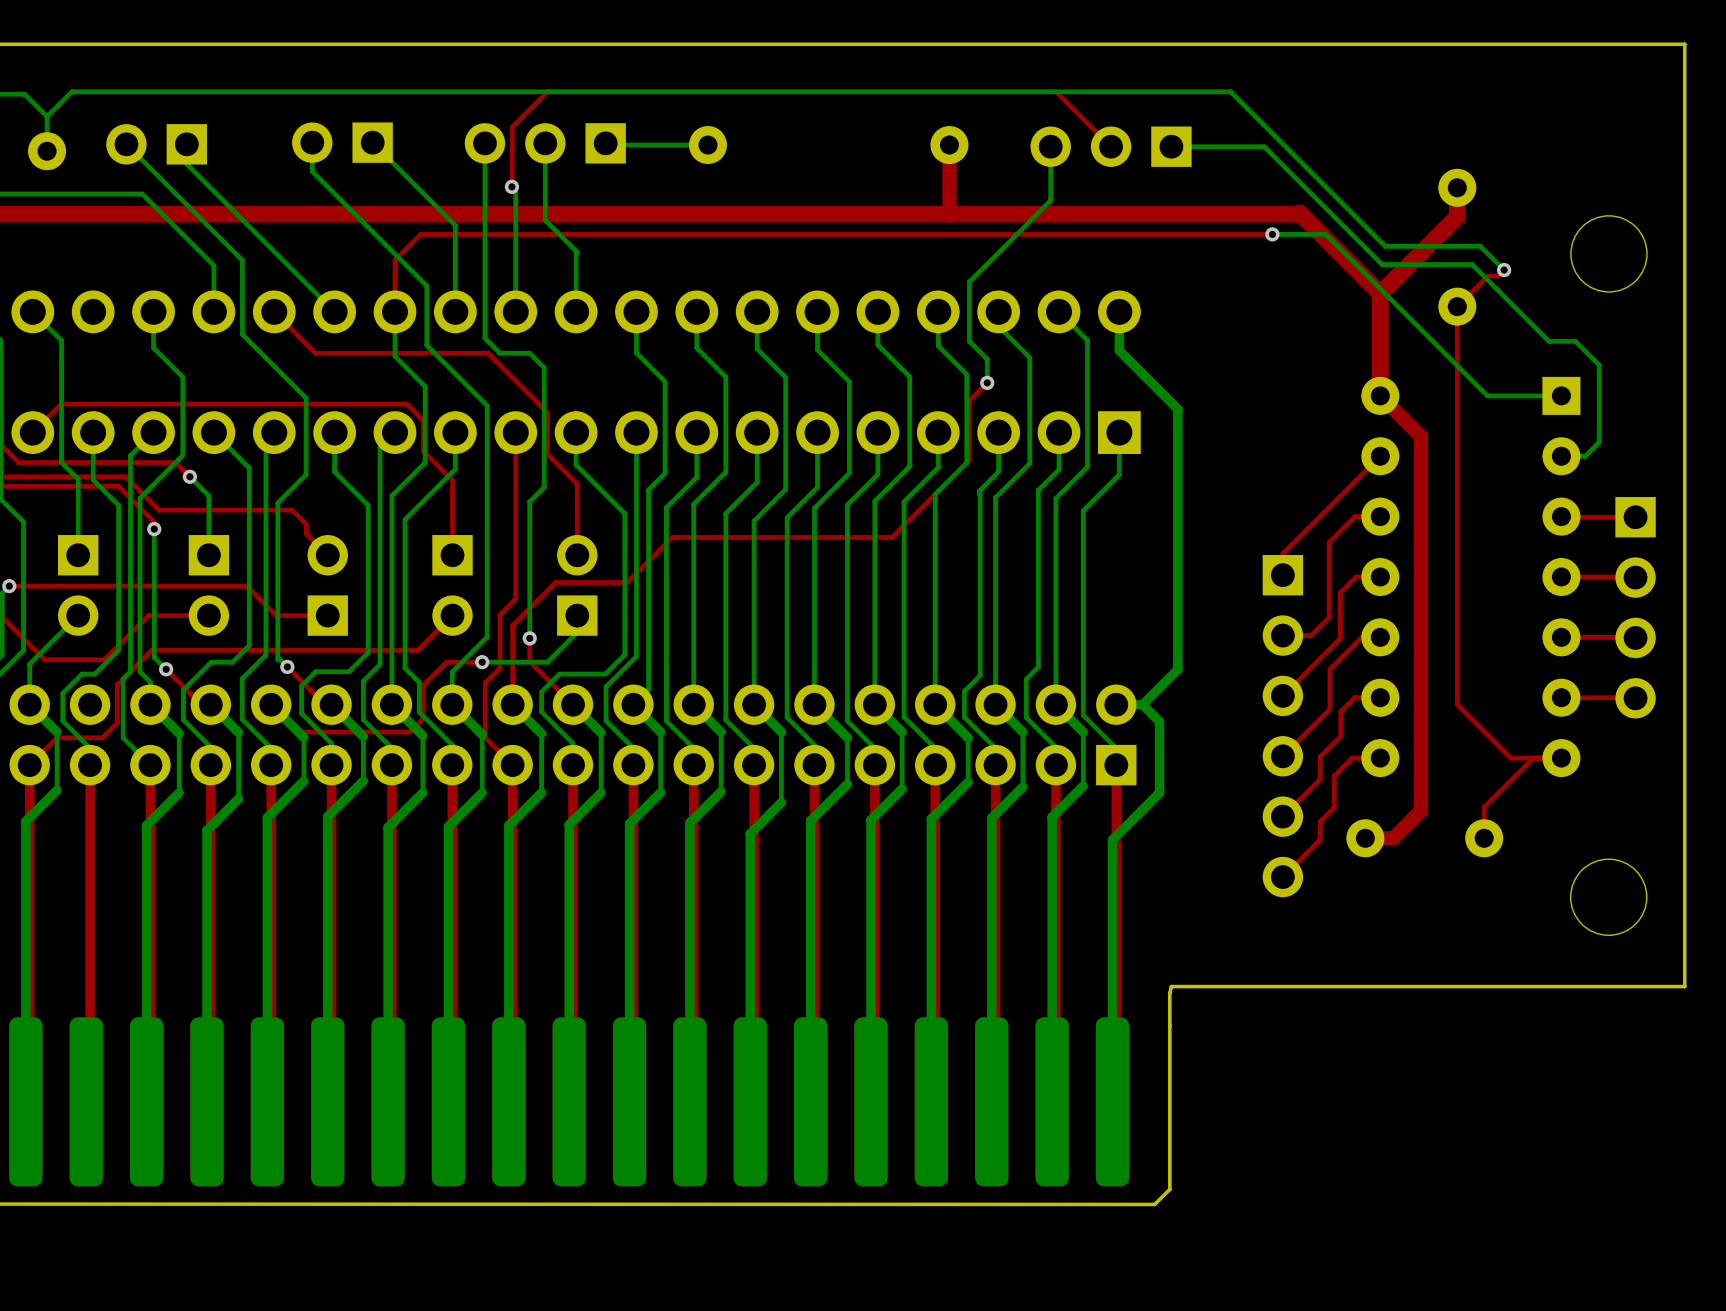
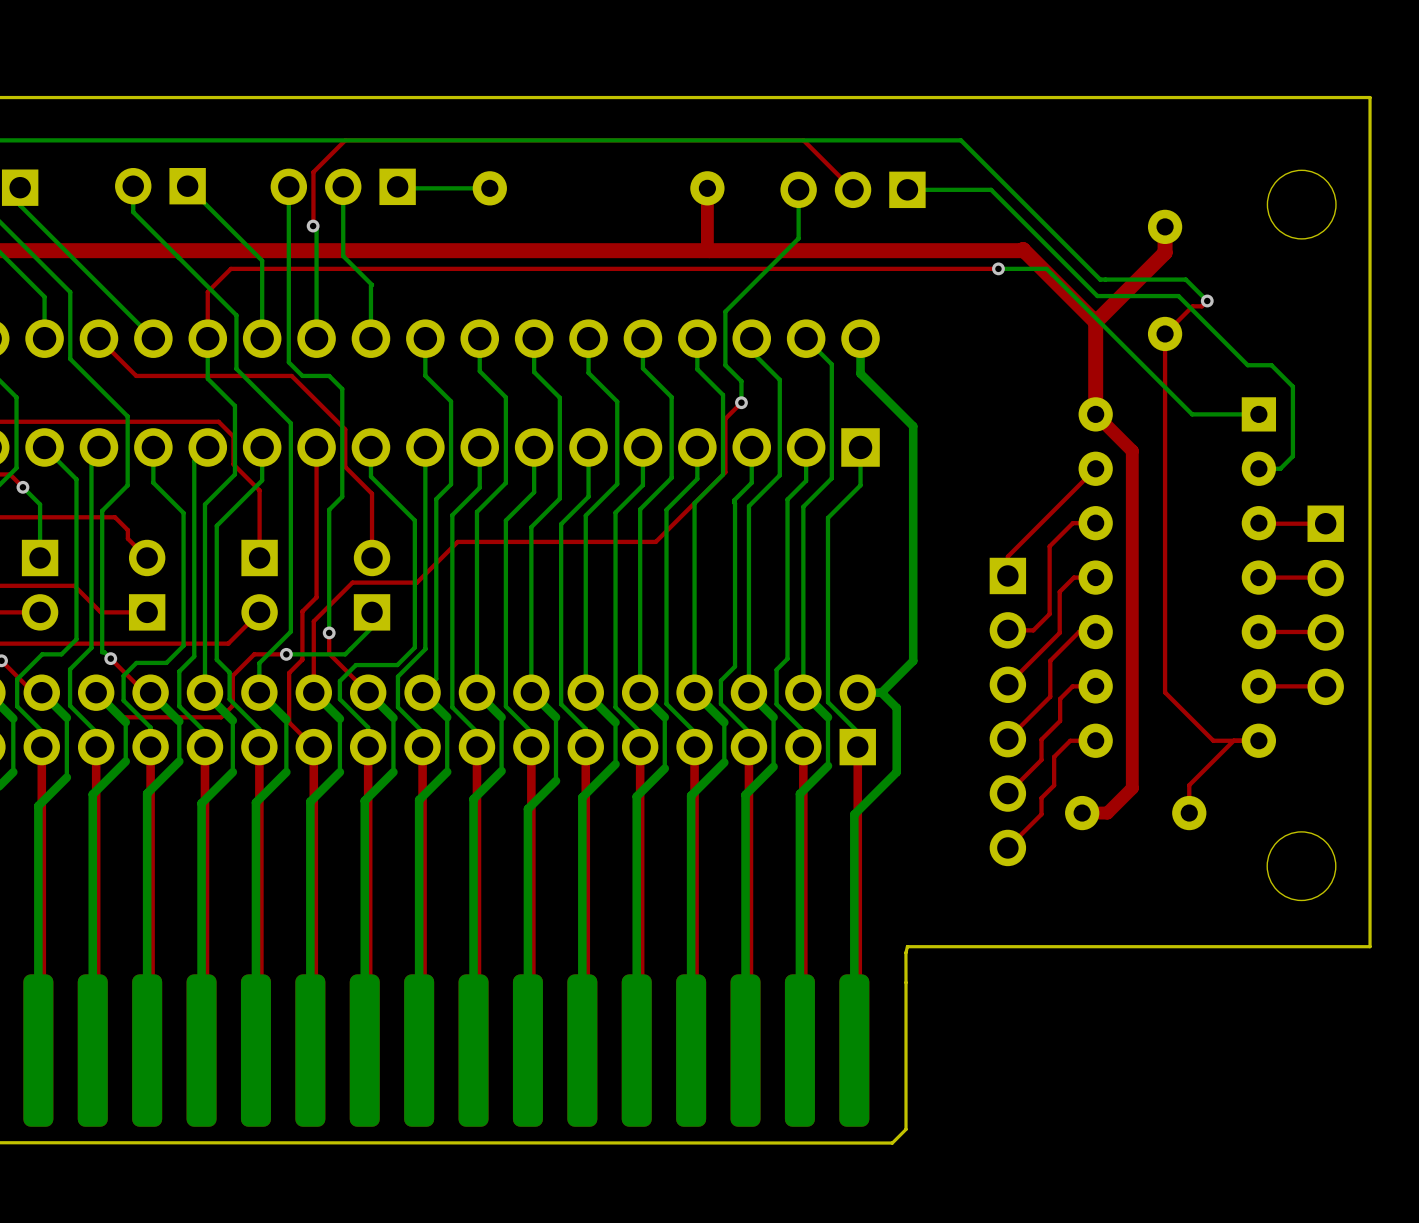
round board edge position: (1608, 253) -> (1301, 204)

